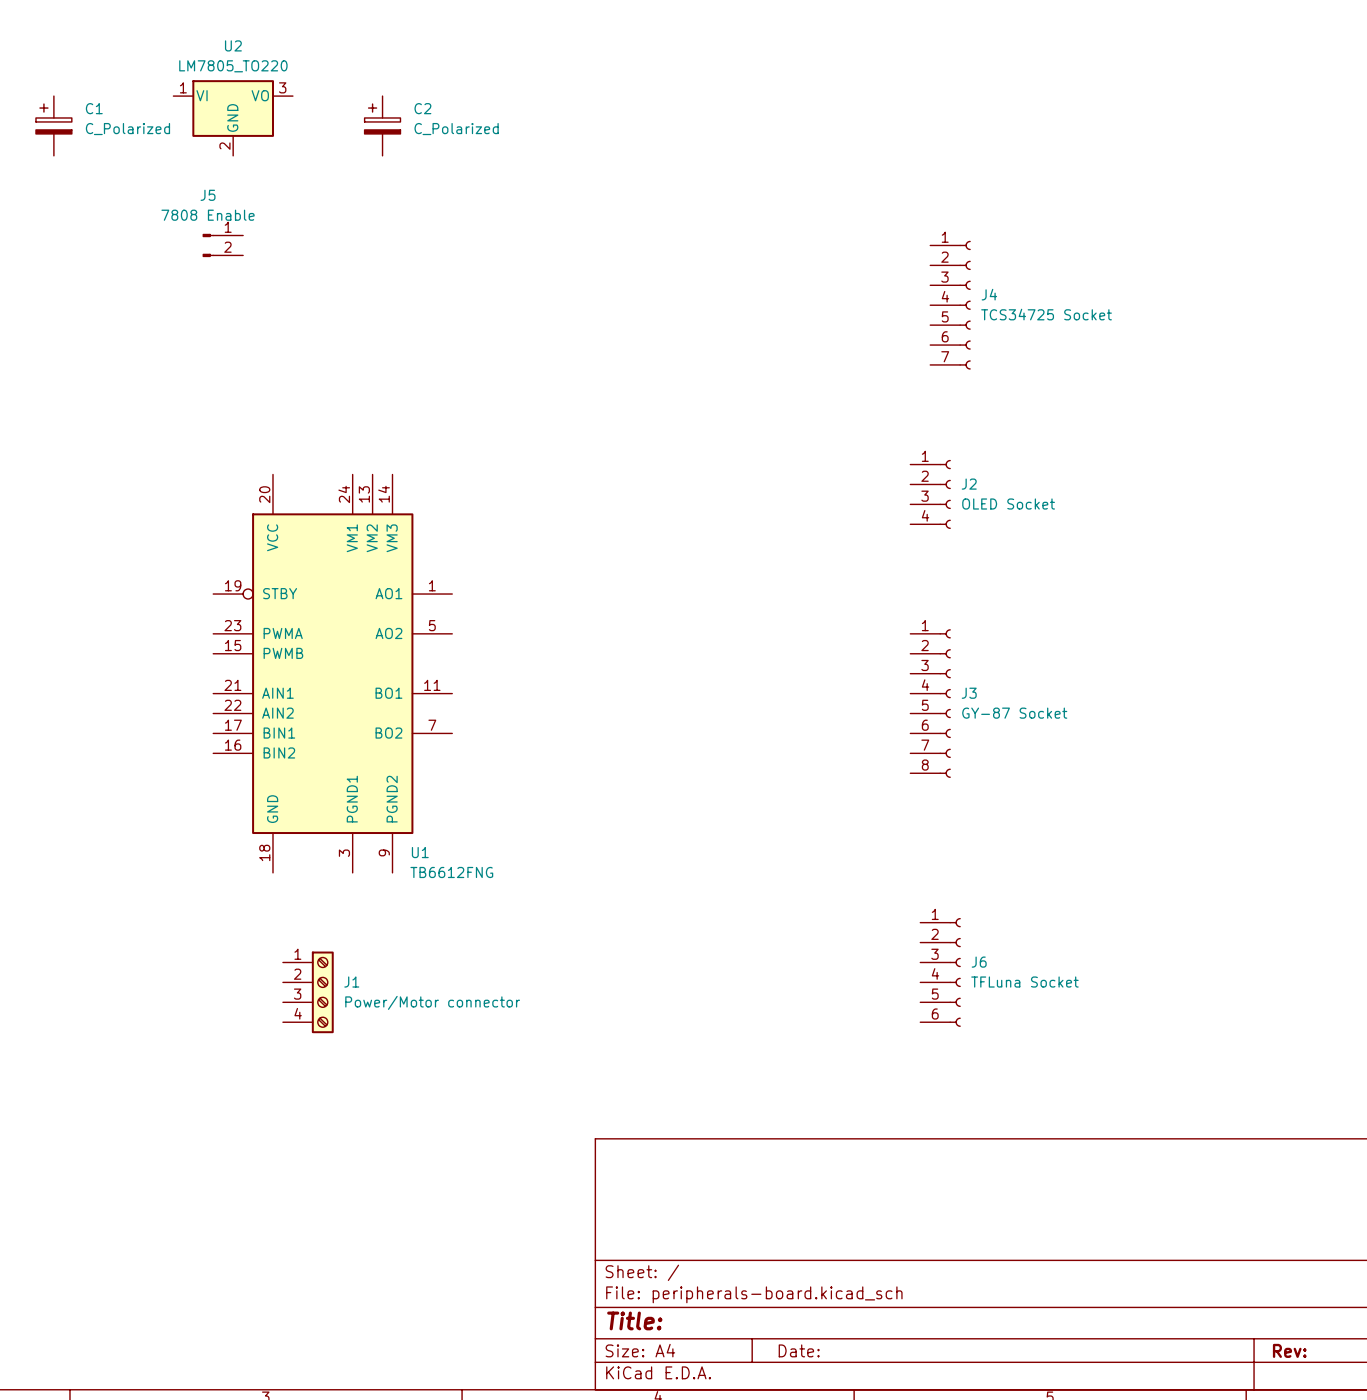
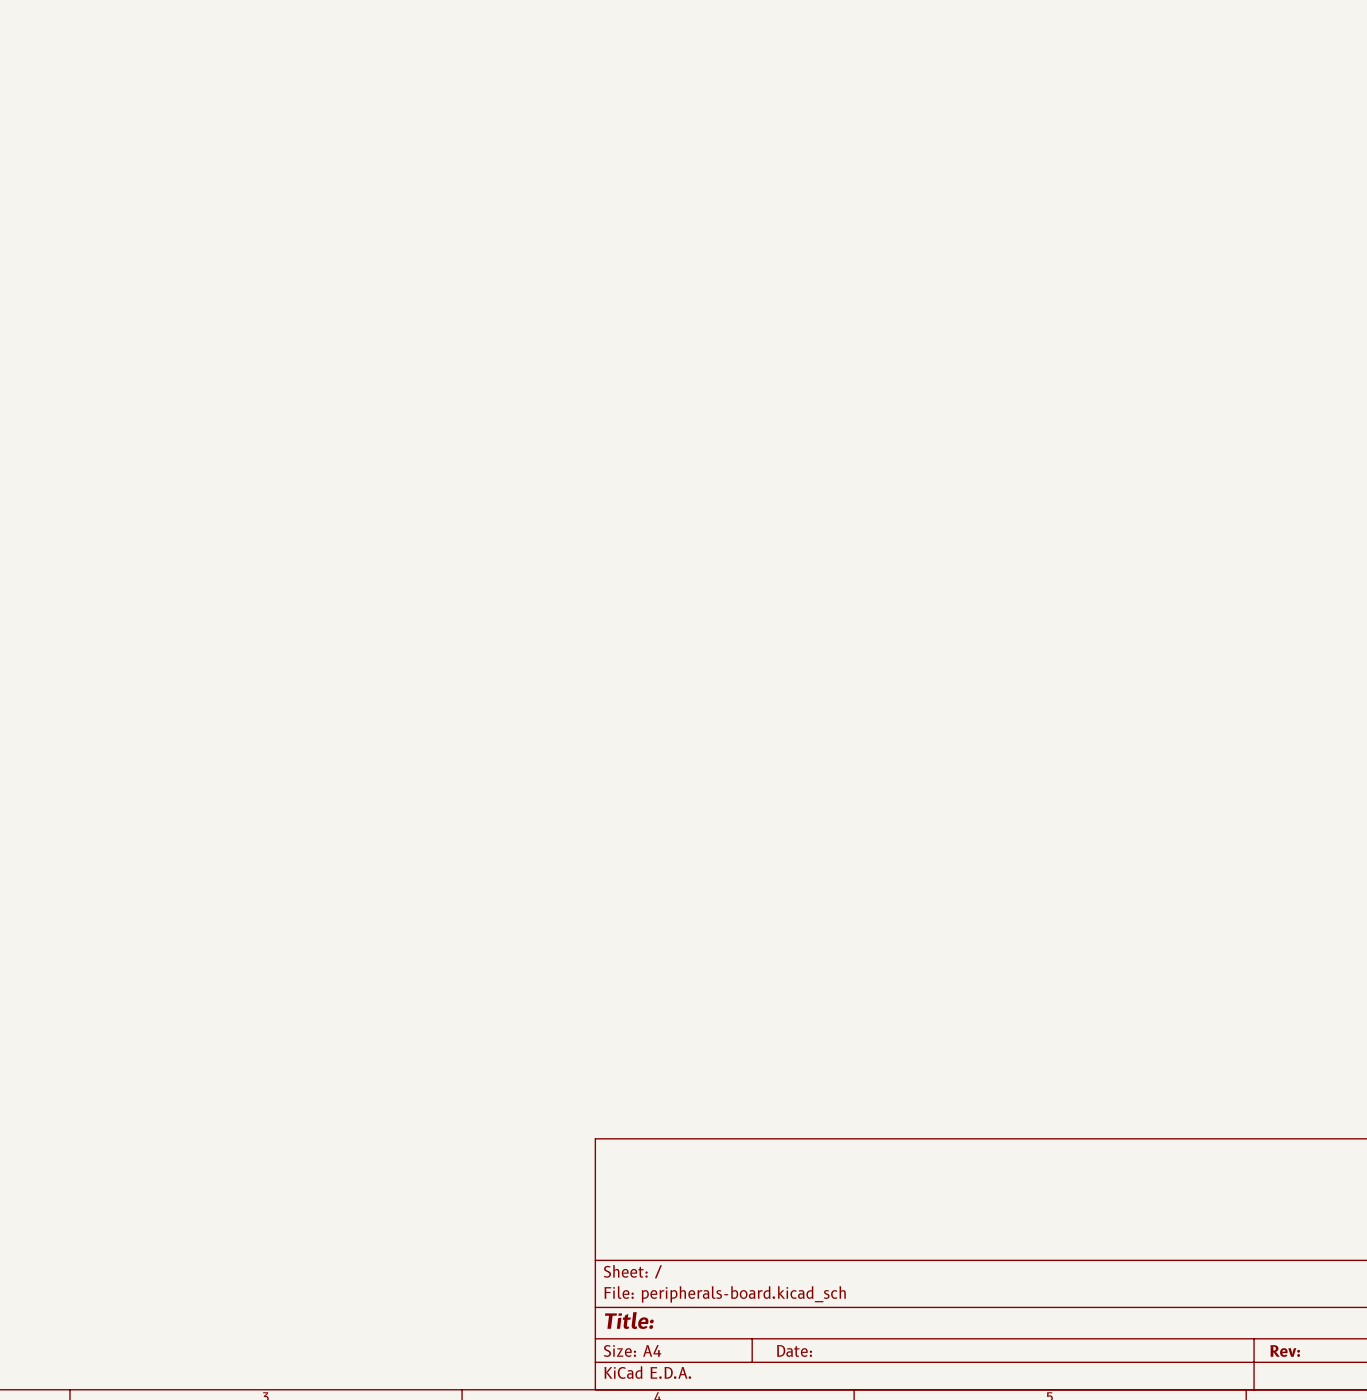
U2: LM7805_TO220 (233, 117) -> none
C1: C_Polarized (53, 125) -> none
C2: C_Polarized (382, 125) -> none
J5: 7808 Enable (222, 245) -> none
J4: TCS34725 Socket (950, 305) -> none
J2: OLED Socket (930, 494) -> none
U1: TB6612FNG (332, 673) -> none
J3: GY-87 Socket (930, 703) -> none
J6: TFLuna Socket (940, 972) -> none
J1: Power/Motor connector (308, 992) -> none

